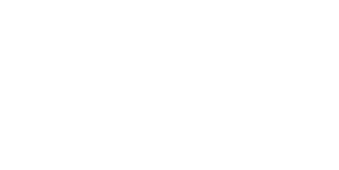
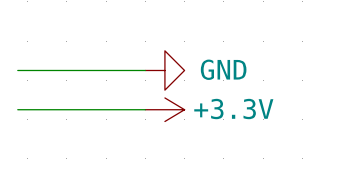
wire: none -> (17, 70) (145, 70)
power symbol: none -> GND (164, 70)
wire: none -> (17, 109) (145, 109)
power symbol: none -> +3.3V (164, 109)

